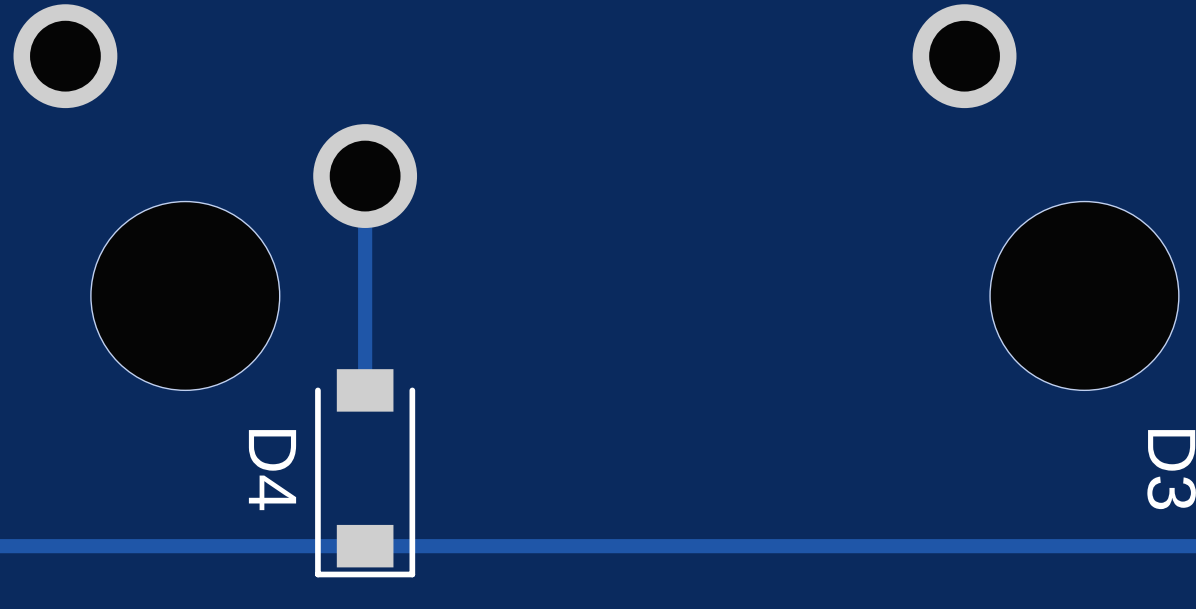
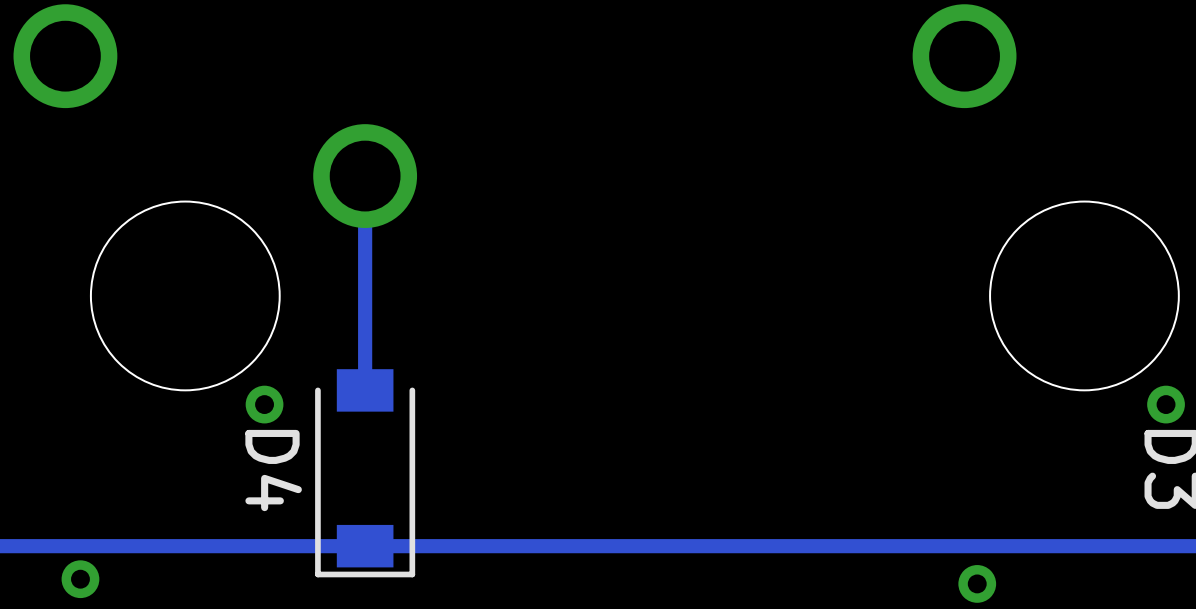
via: none -> (264, 404)
via: none -> (1166, 404)
via: none -> (80, 579)
via: none -> (977, 583)

